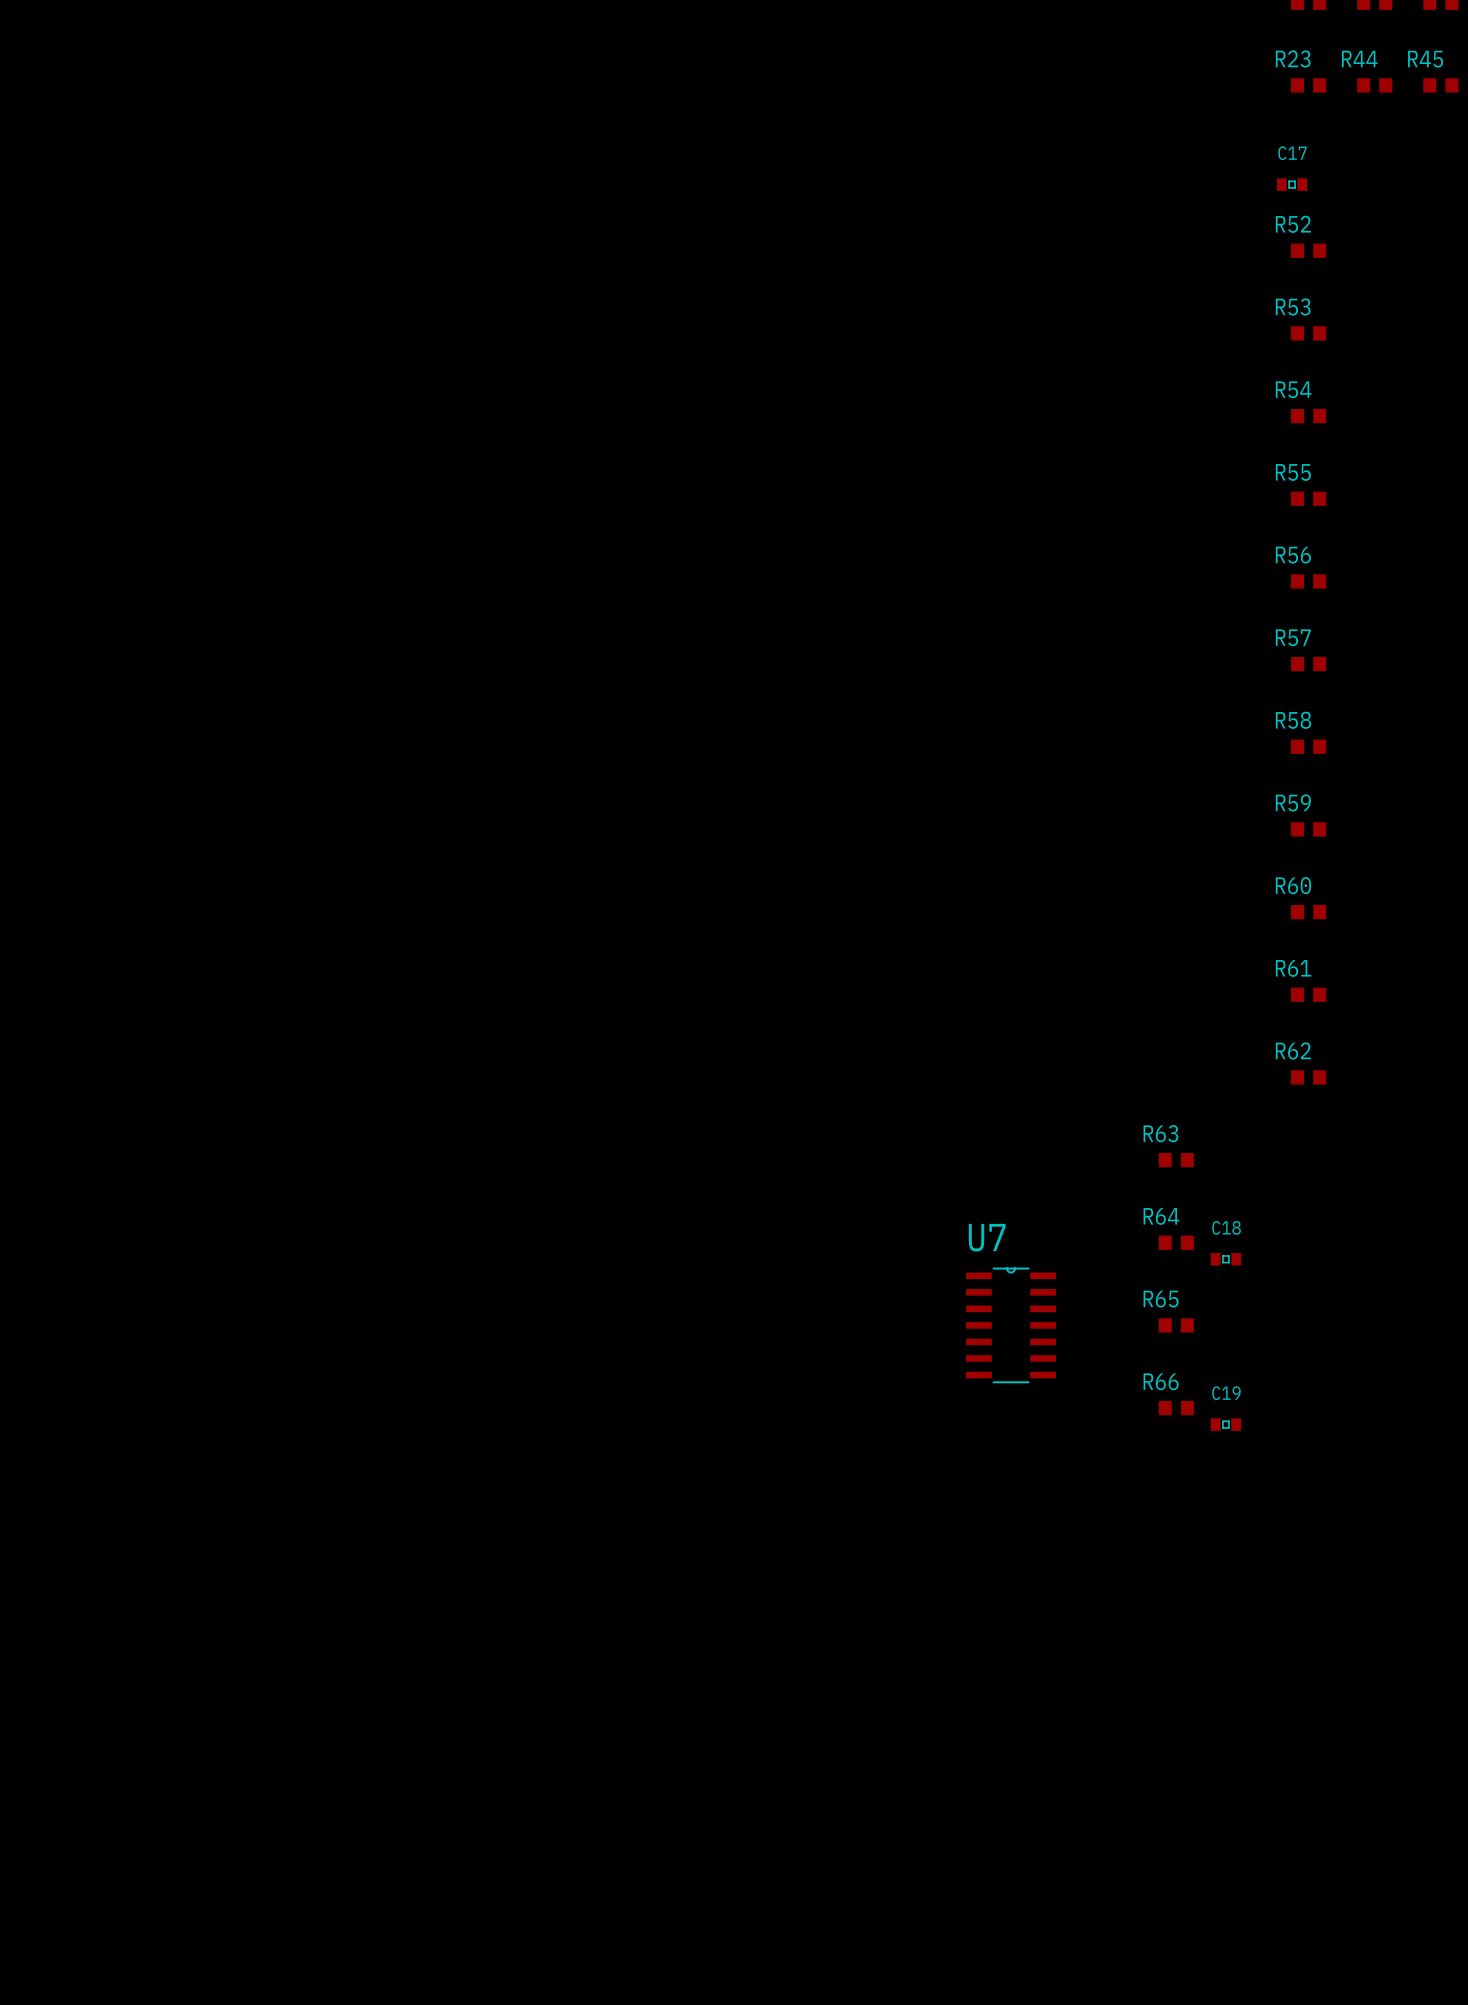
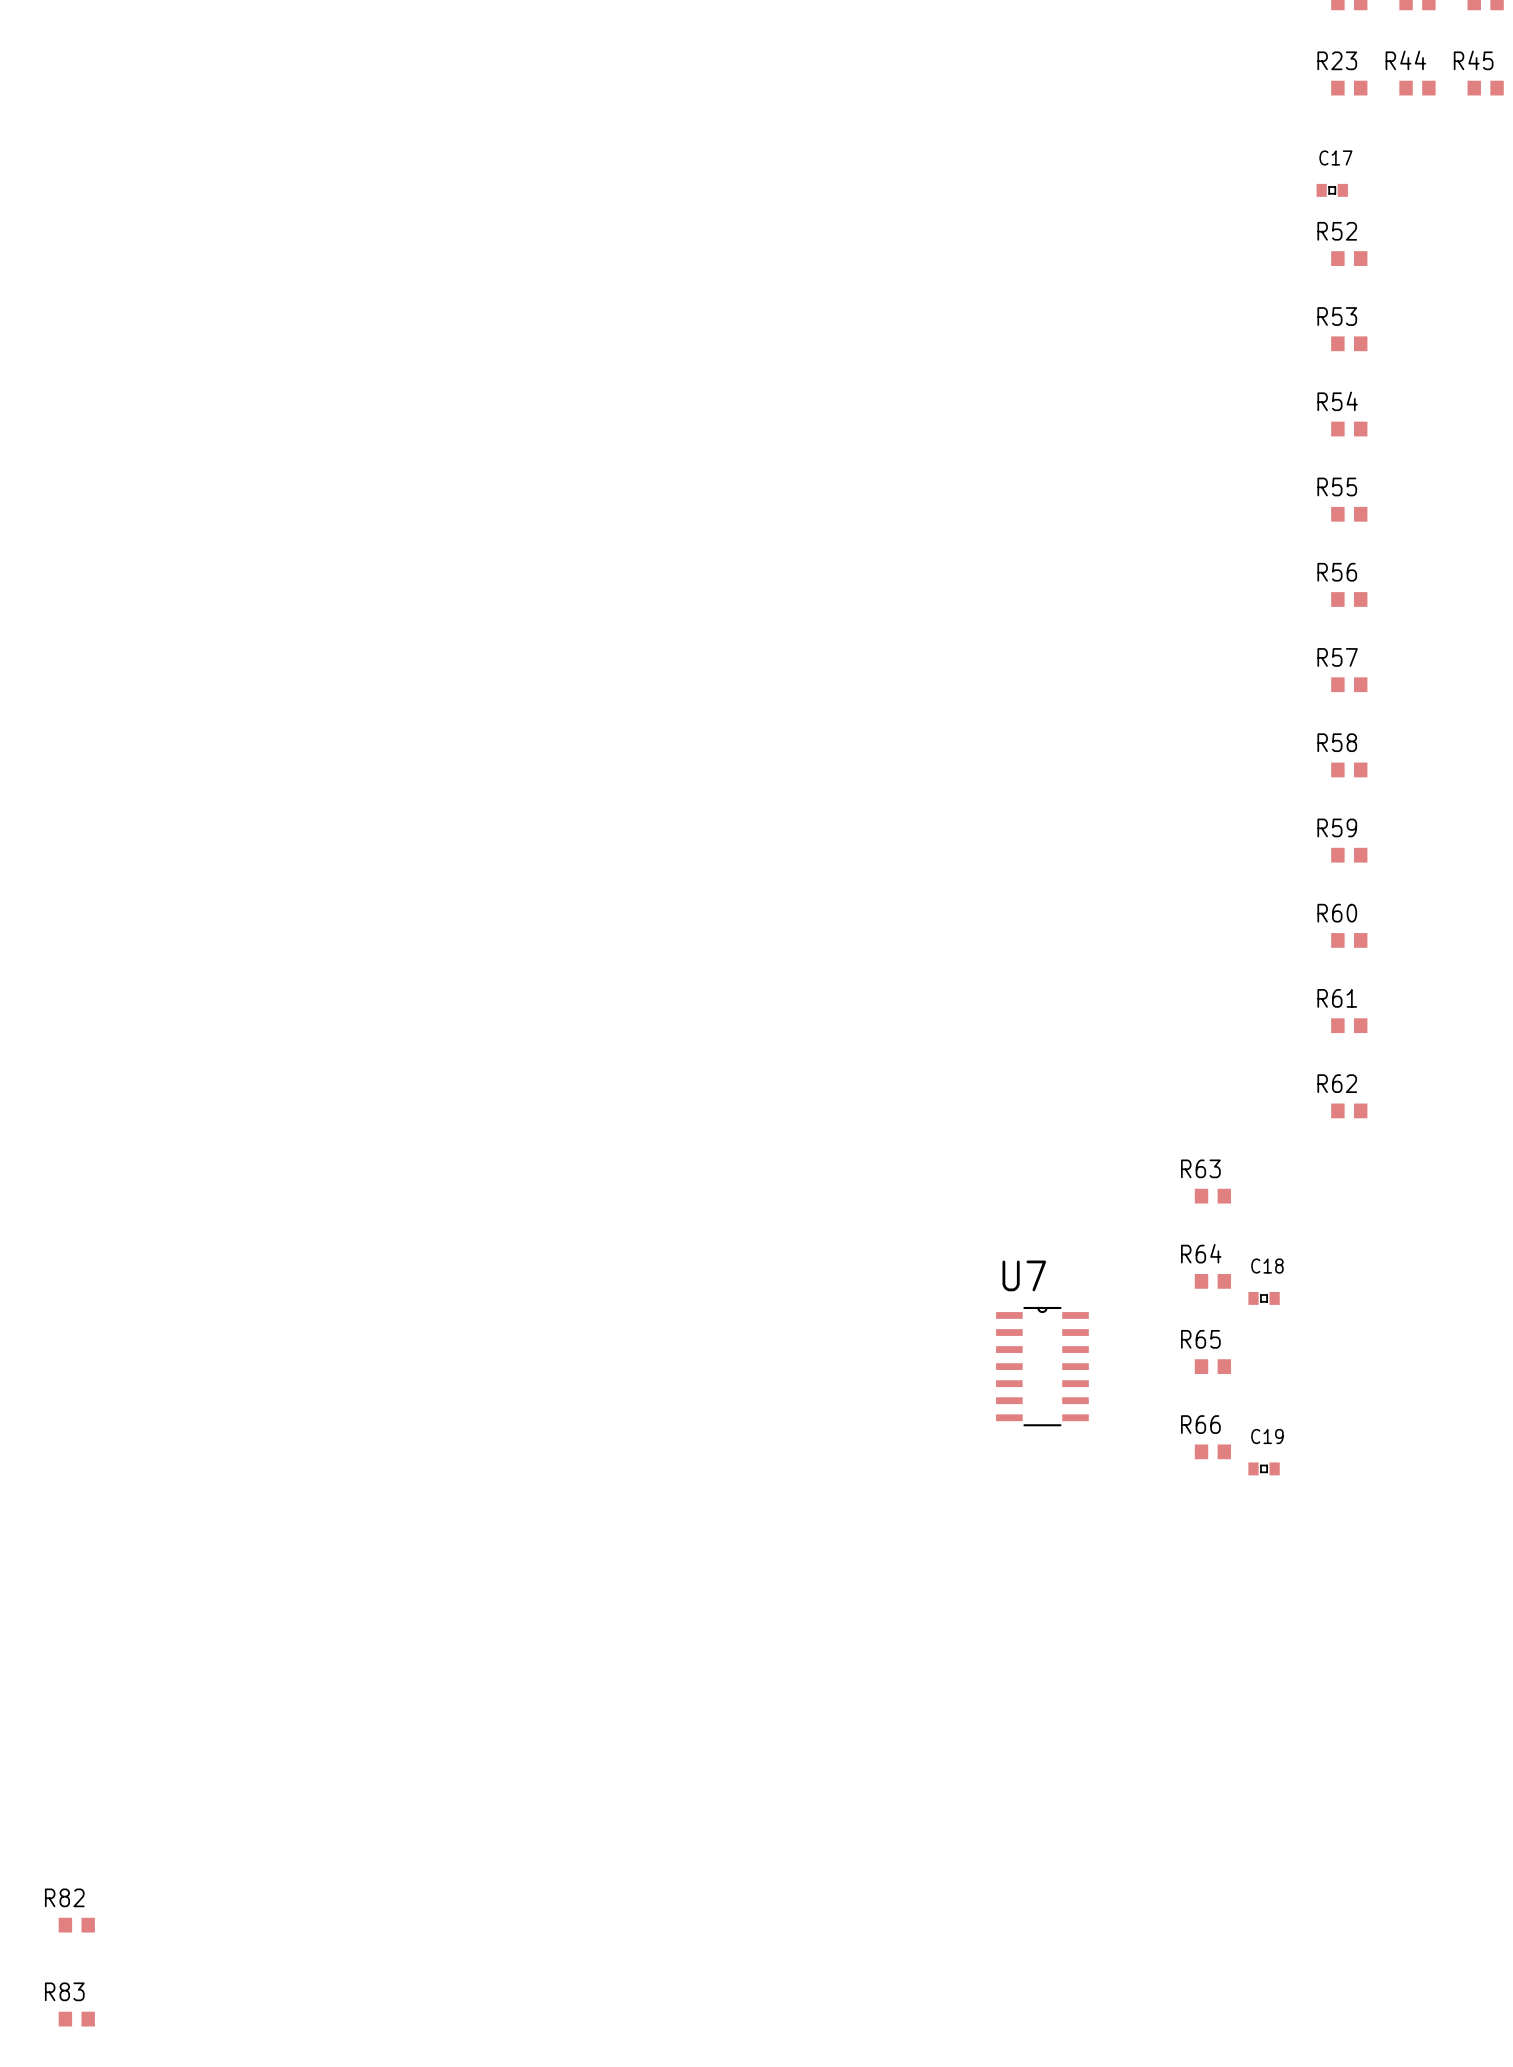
R82: none -> (76, 1925)
R83: none -> (76, 2019)

